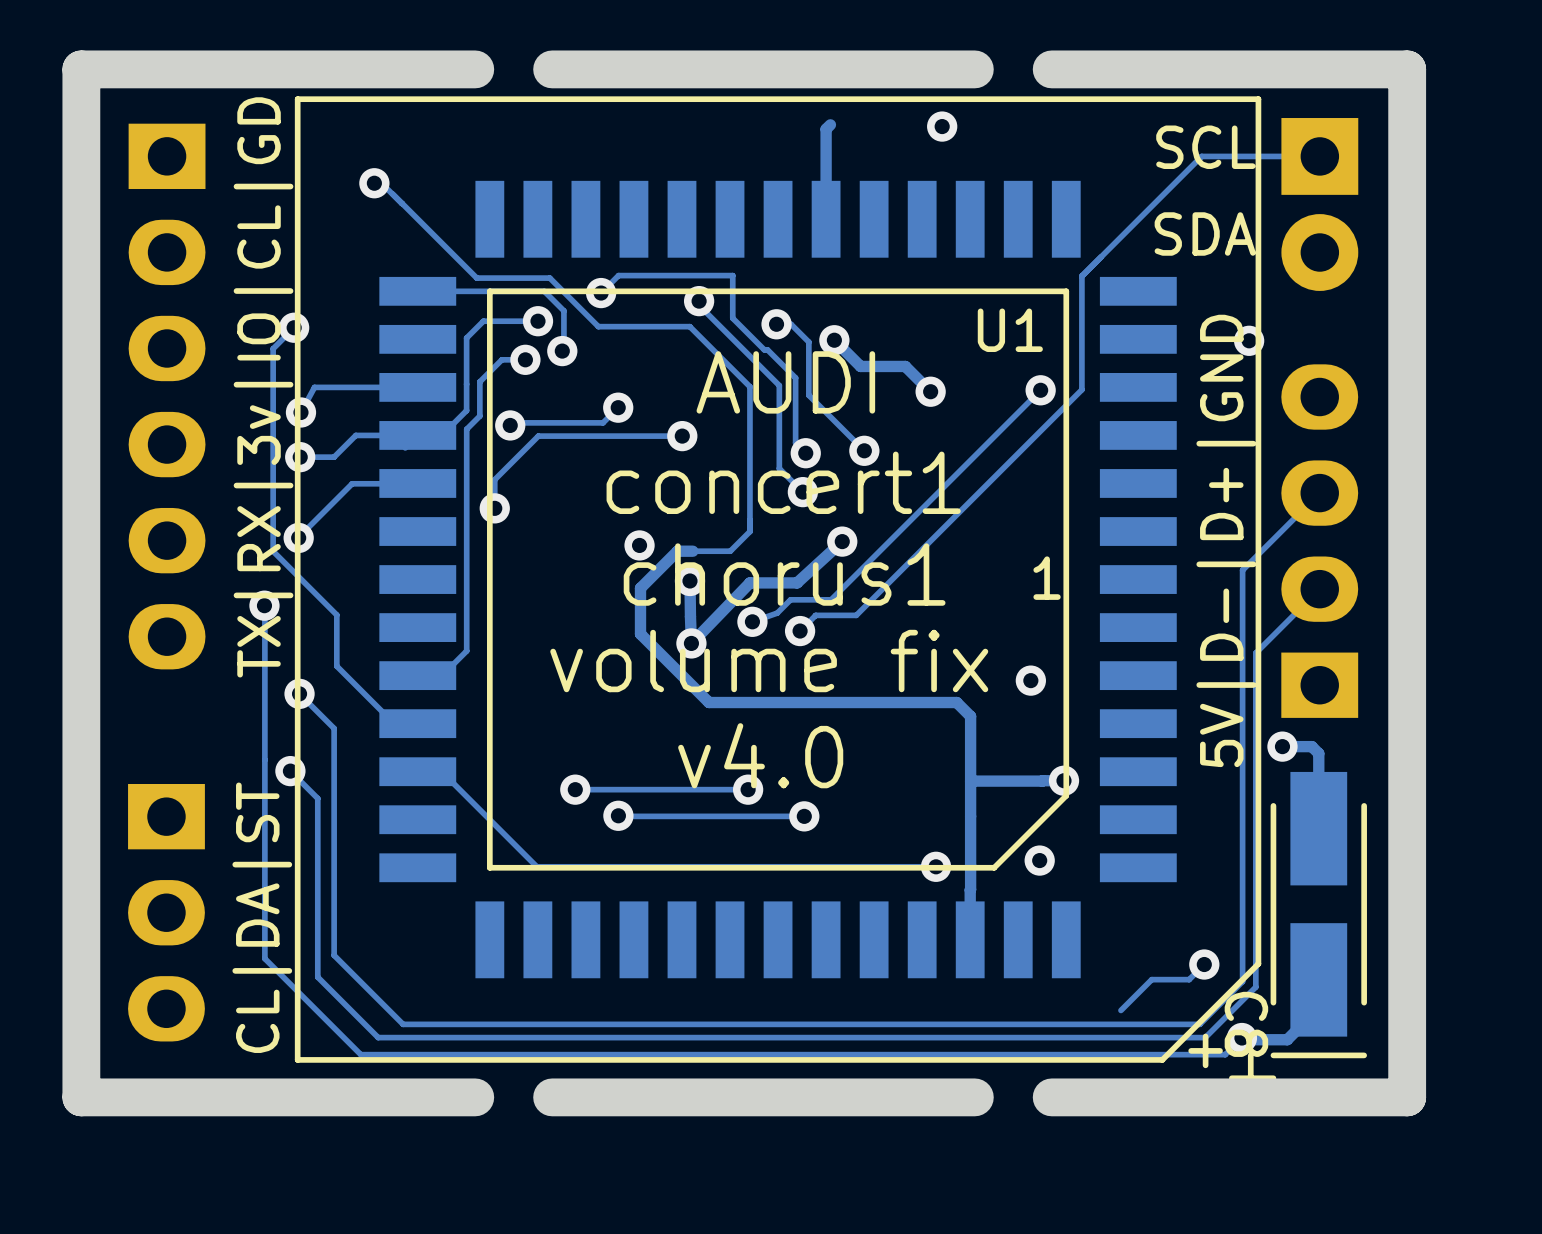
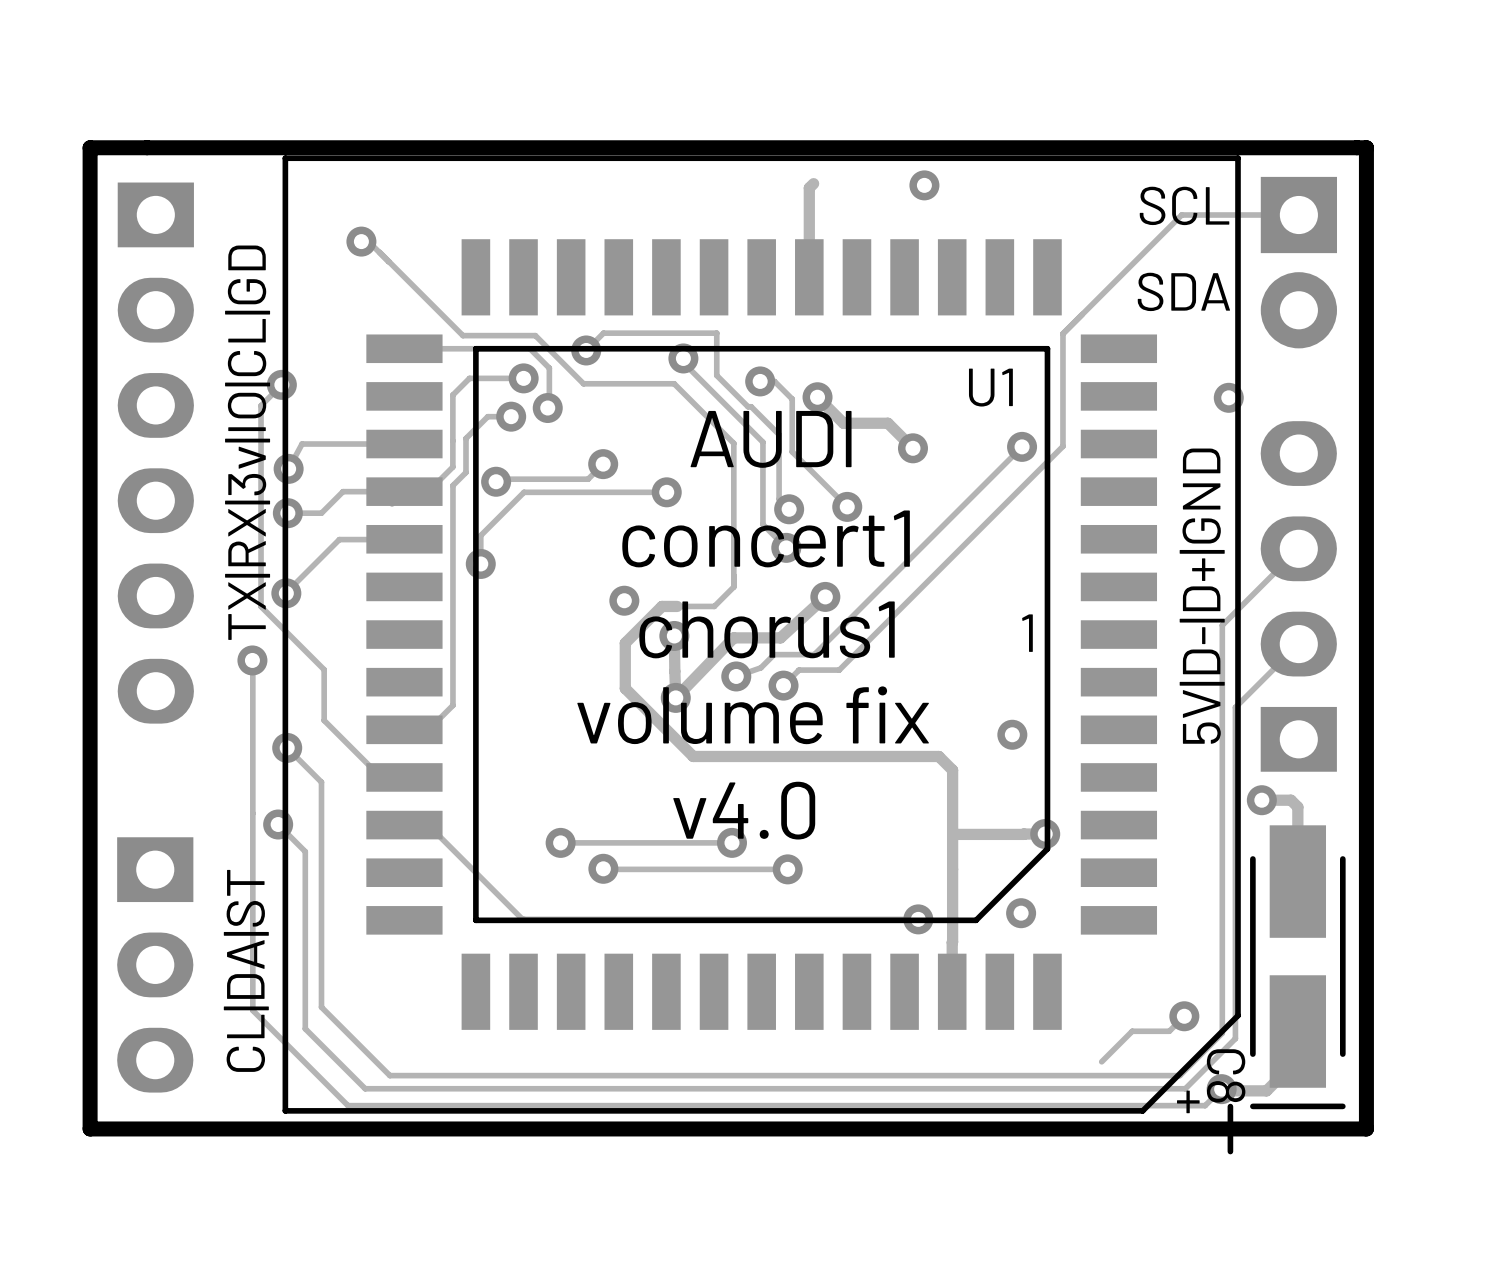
board edge: (475, 69) (81, 69) (81, 1097) (475, 1097) -> none
board edge: (974, 69) (552, 69) -> none
board edge: (1051, 69) (1407, 69) (1407, 1097) (1051, 1097) -> none
board edge: none -> (1366, 147) (90, 147) (90, 1128) (1366, 1128) (1366, 147)
board edge: (974, 1097) (552, 1097) -> none

